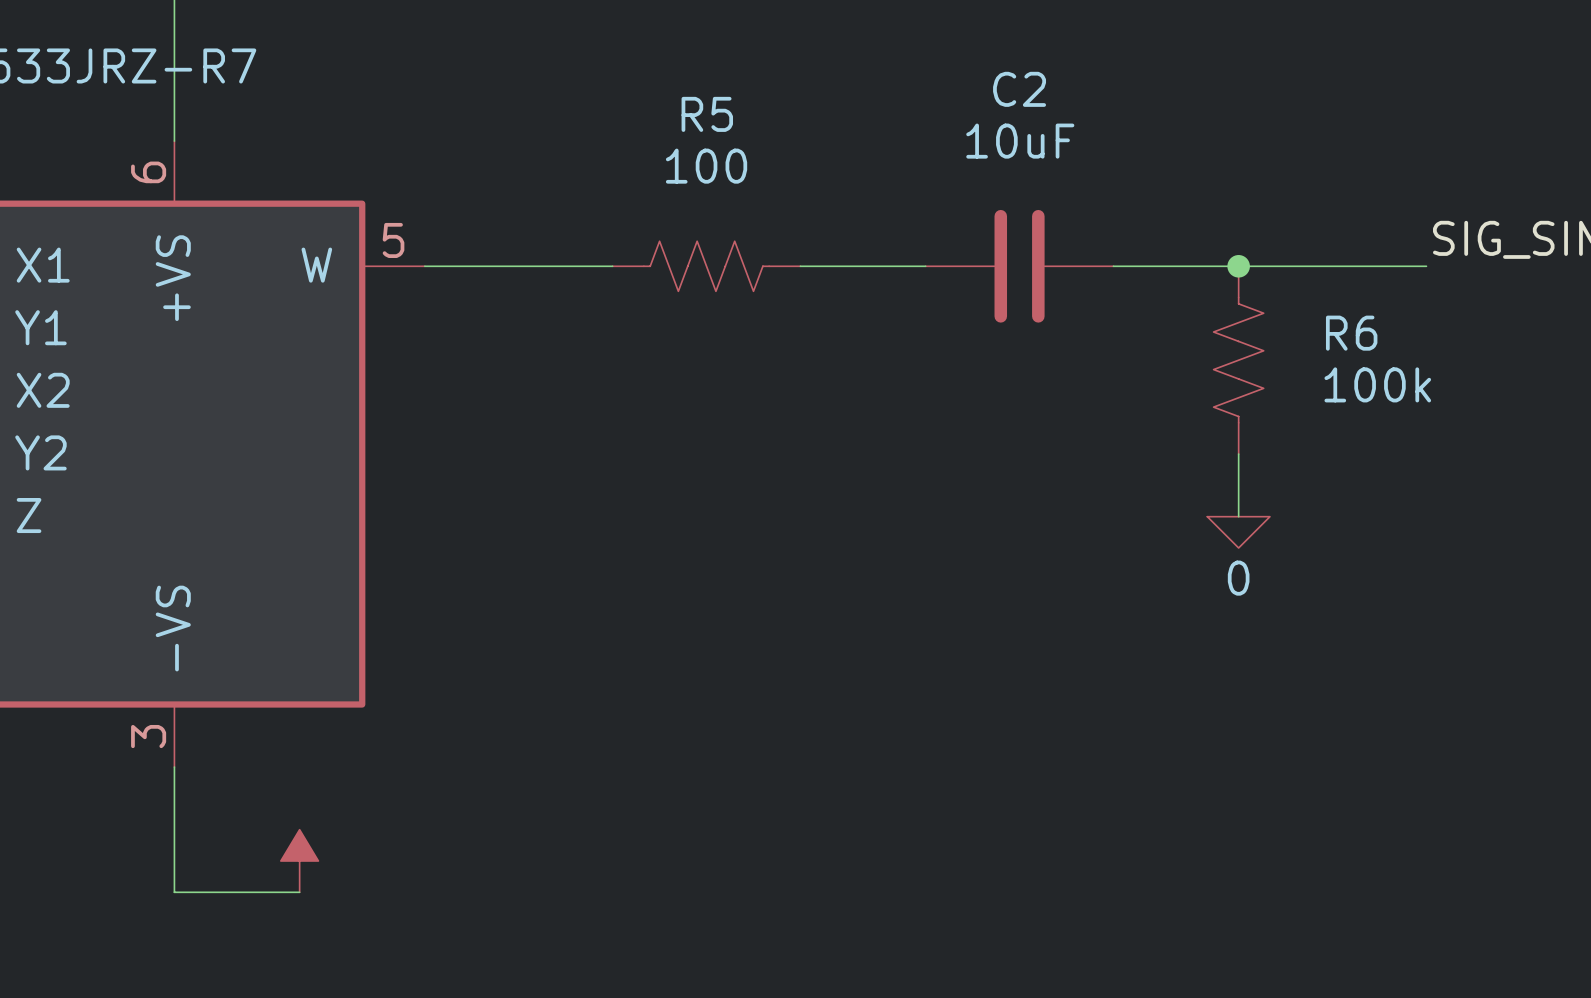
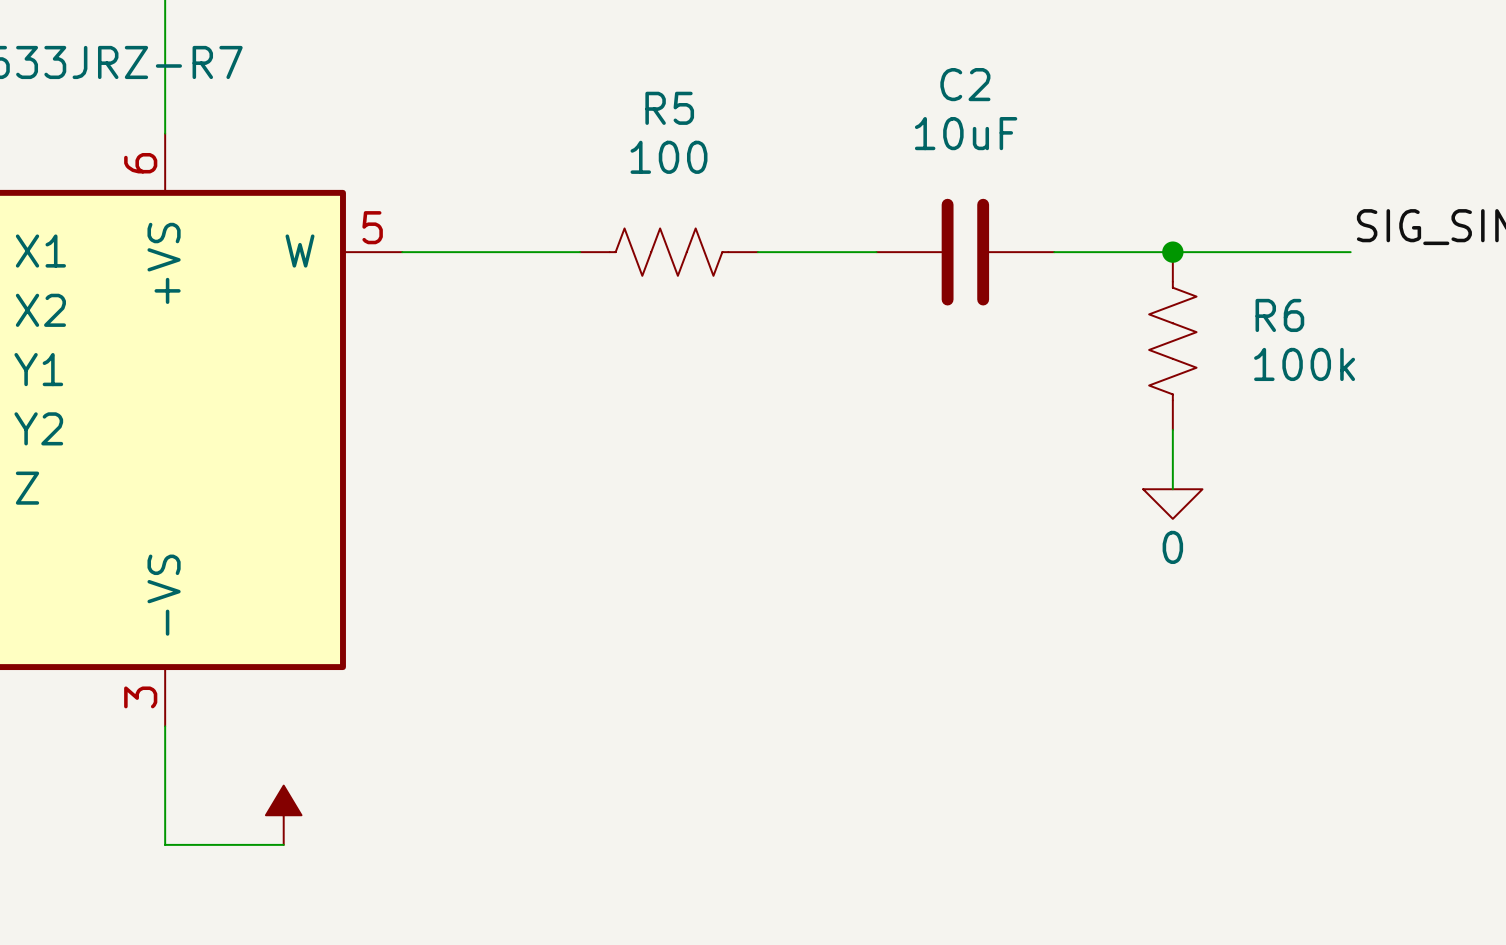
part pin name: Y1 (40, 327) -> X2 (40, 310)
part pin name: X2 (43, 390) -> Y1 (38, 369)

